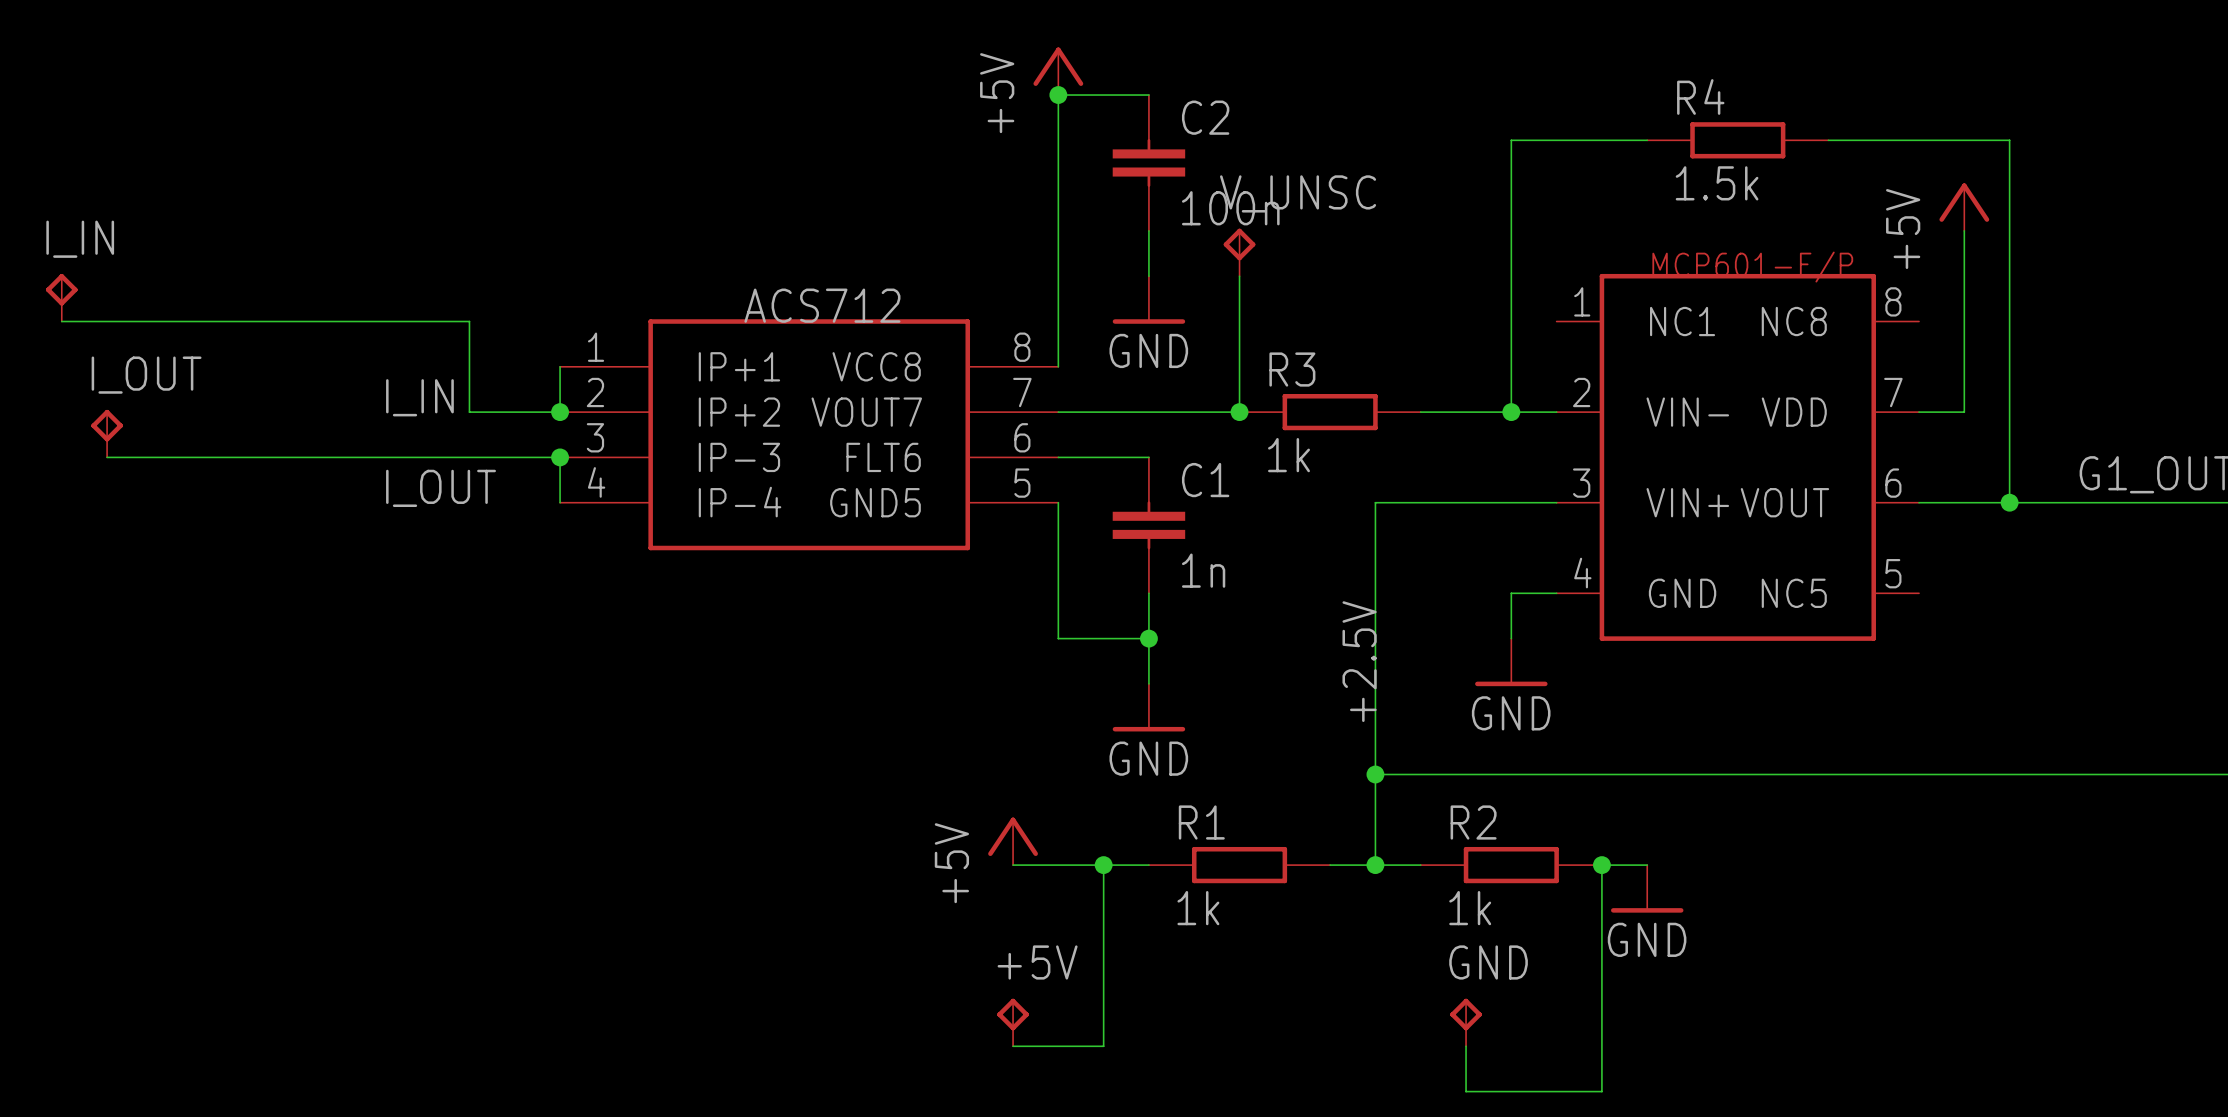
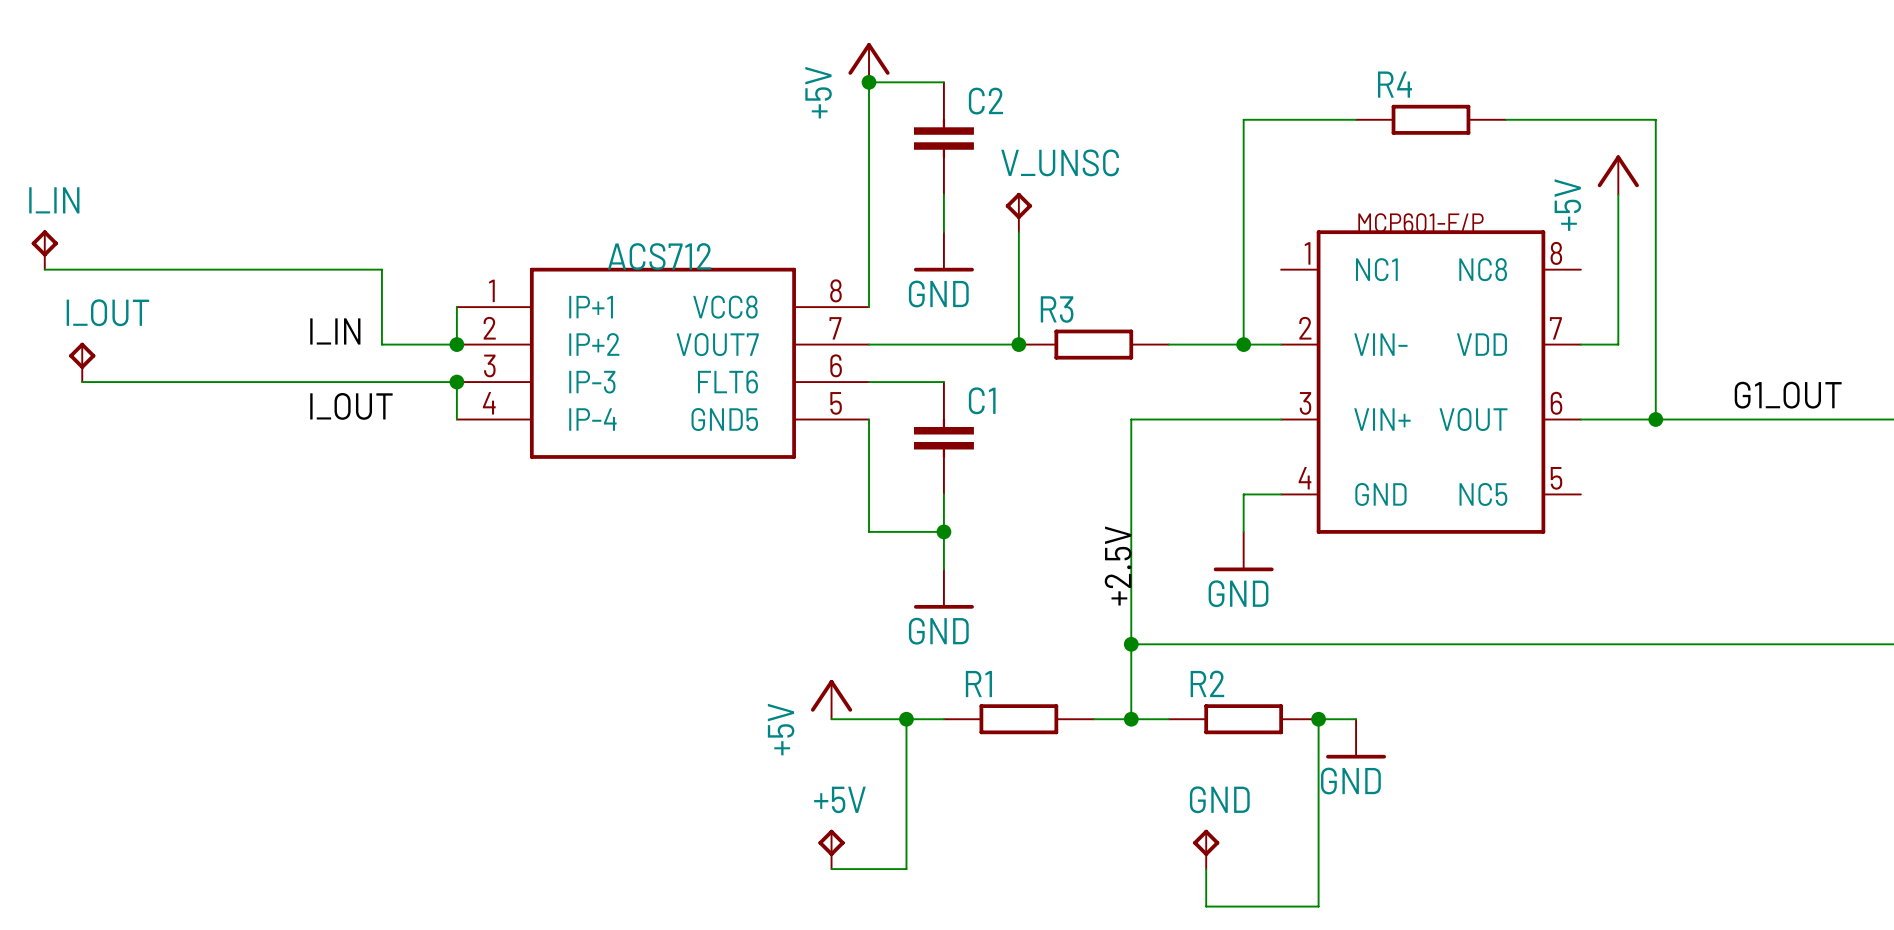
R4 value: 1.5k (1717, 183) -> none
C2 value: 100n (1230, 208) -> none
R3 value: 1k (1289, 455) -> none
C1 value: 1n (1203, 570) -> none
R1 value: 1k (1198, 908) -> none
R2 value: 1k (1470, 908) -> none

